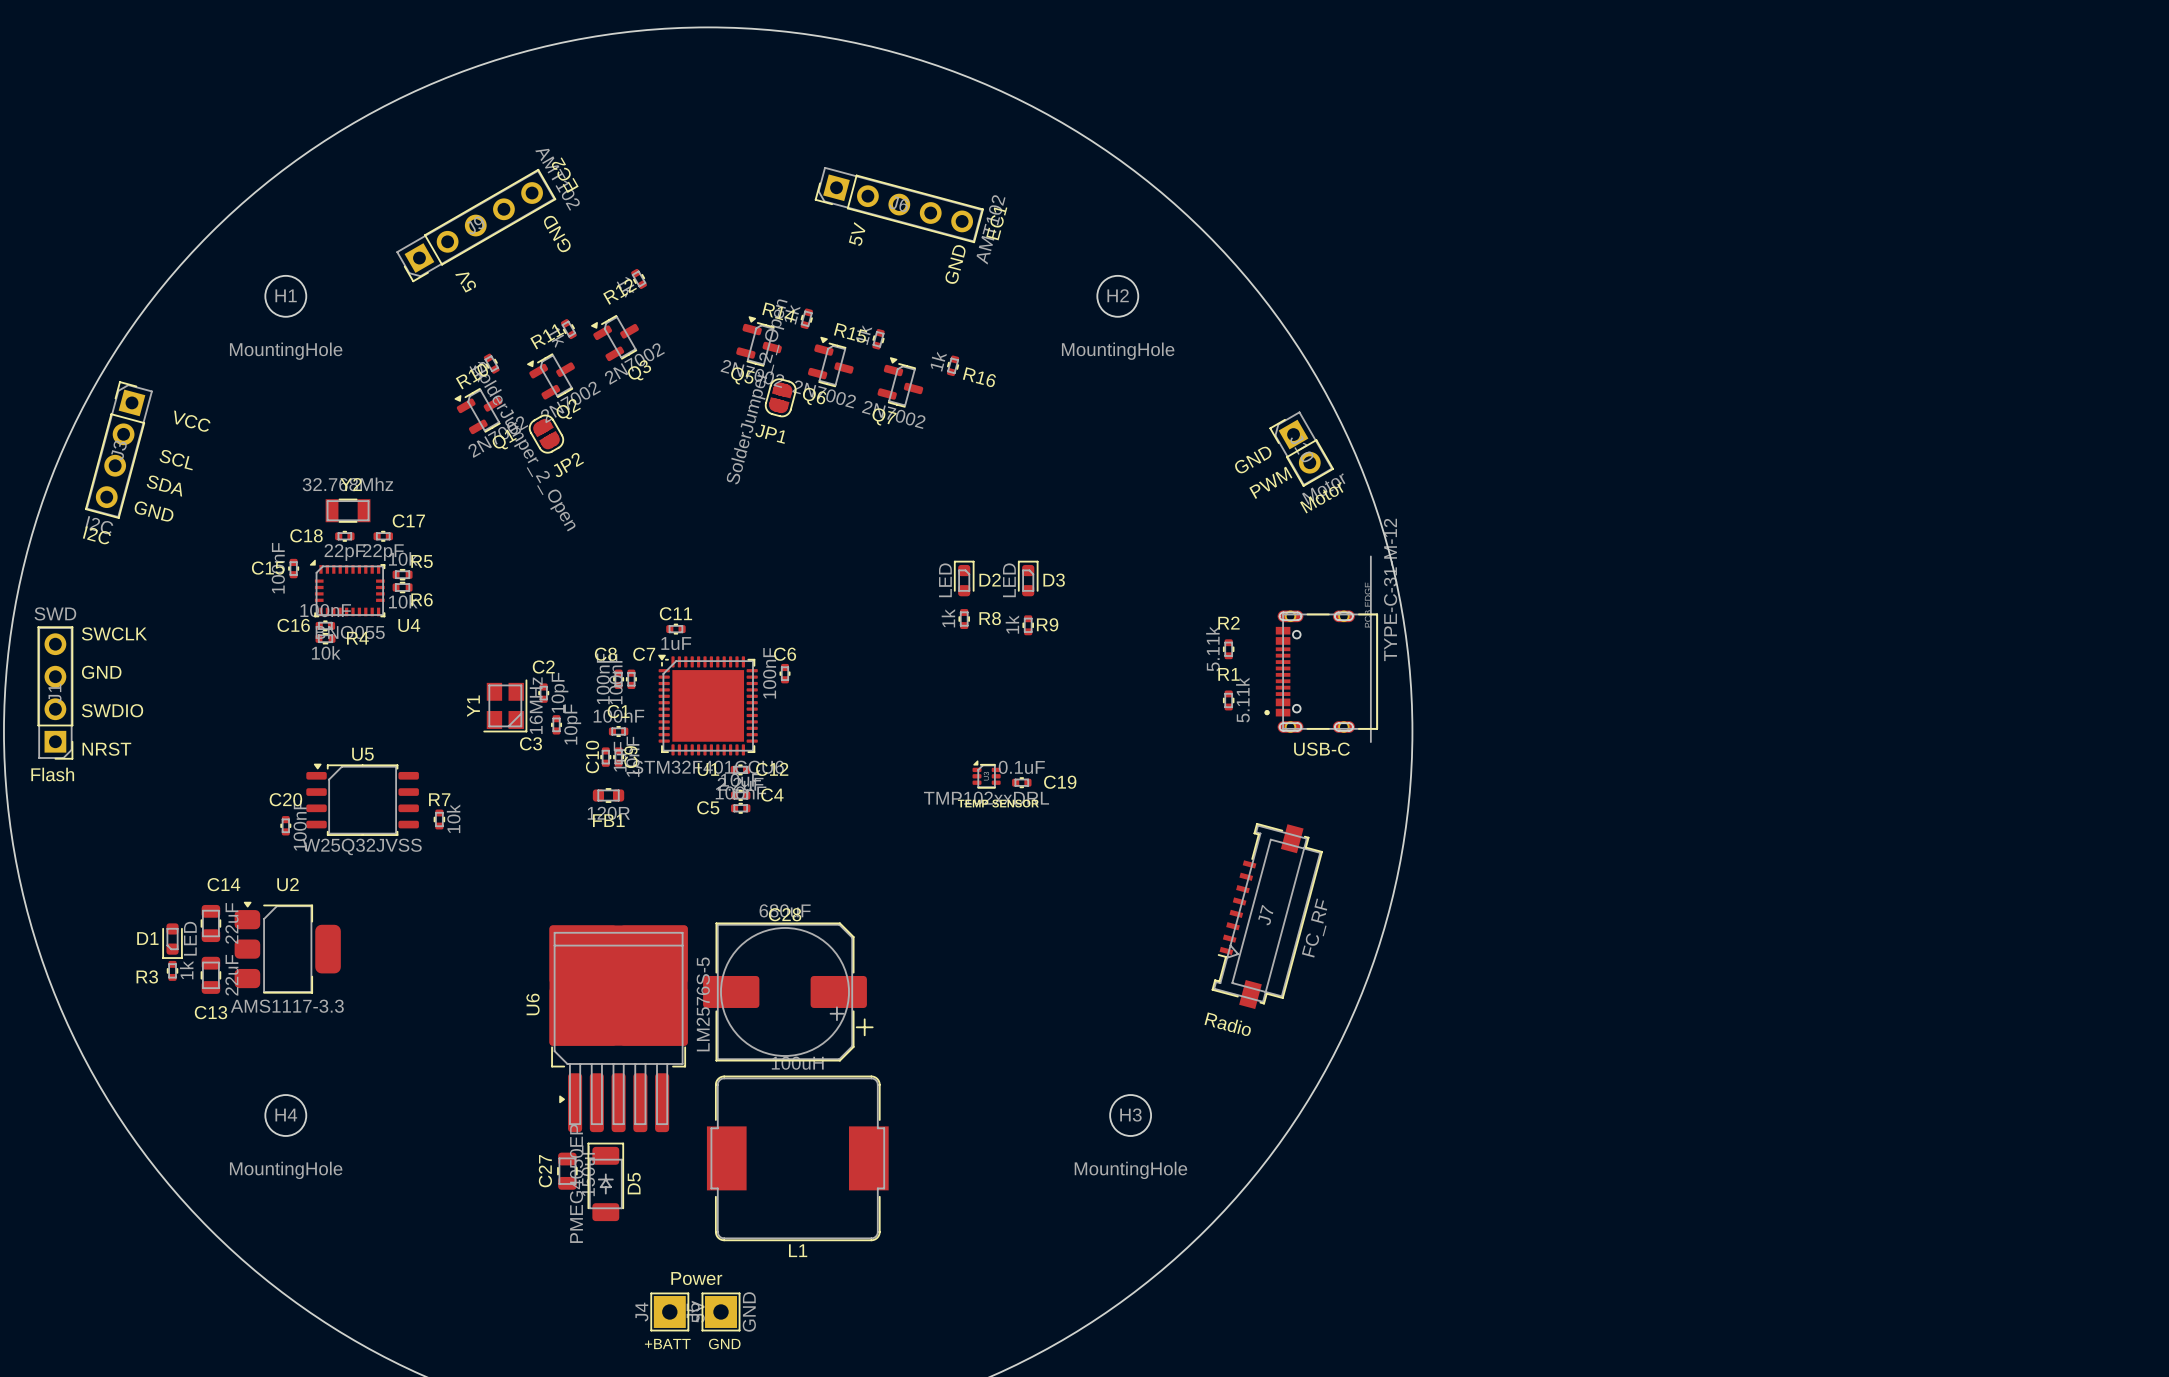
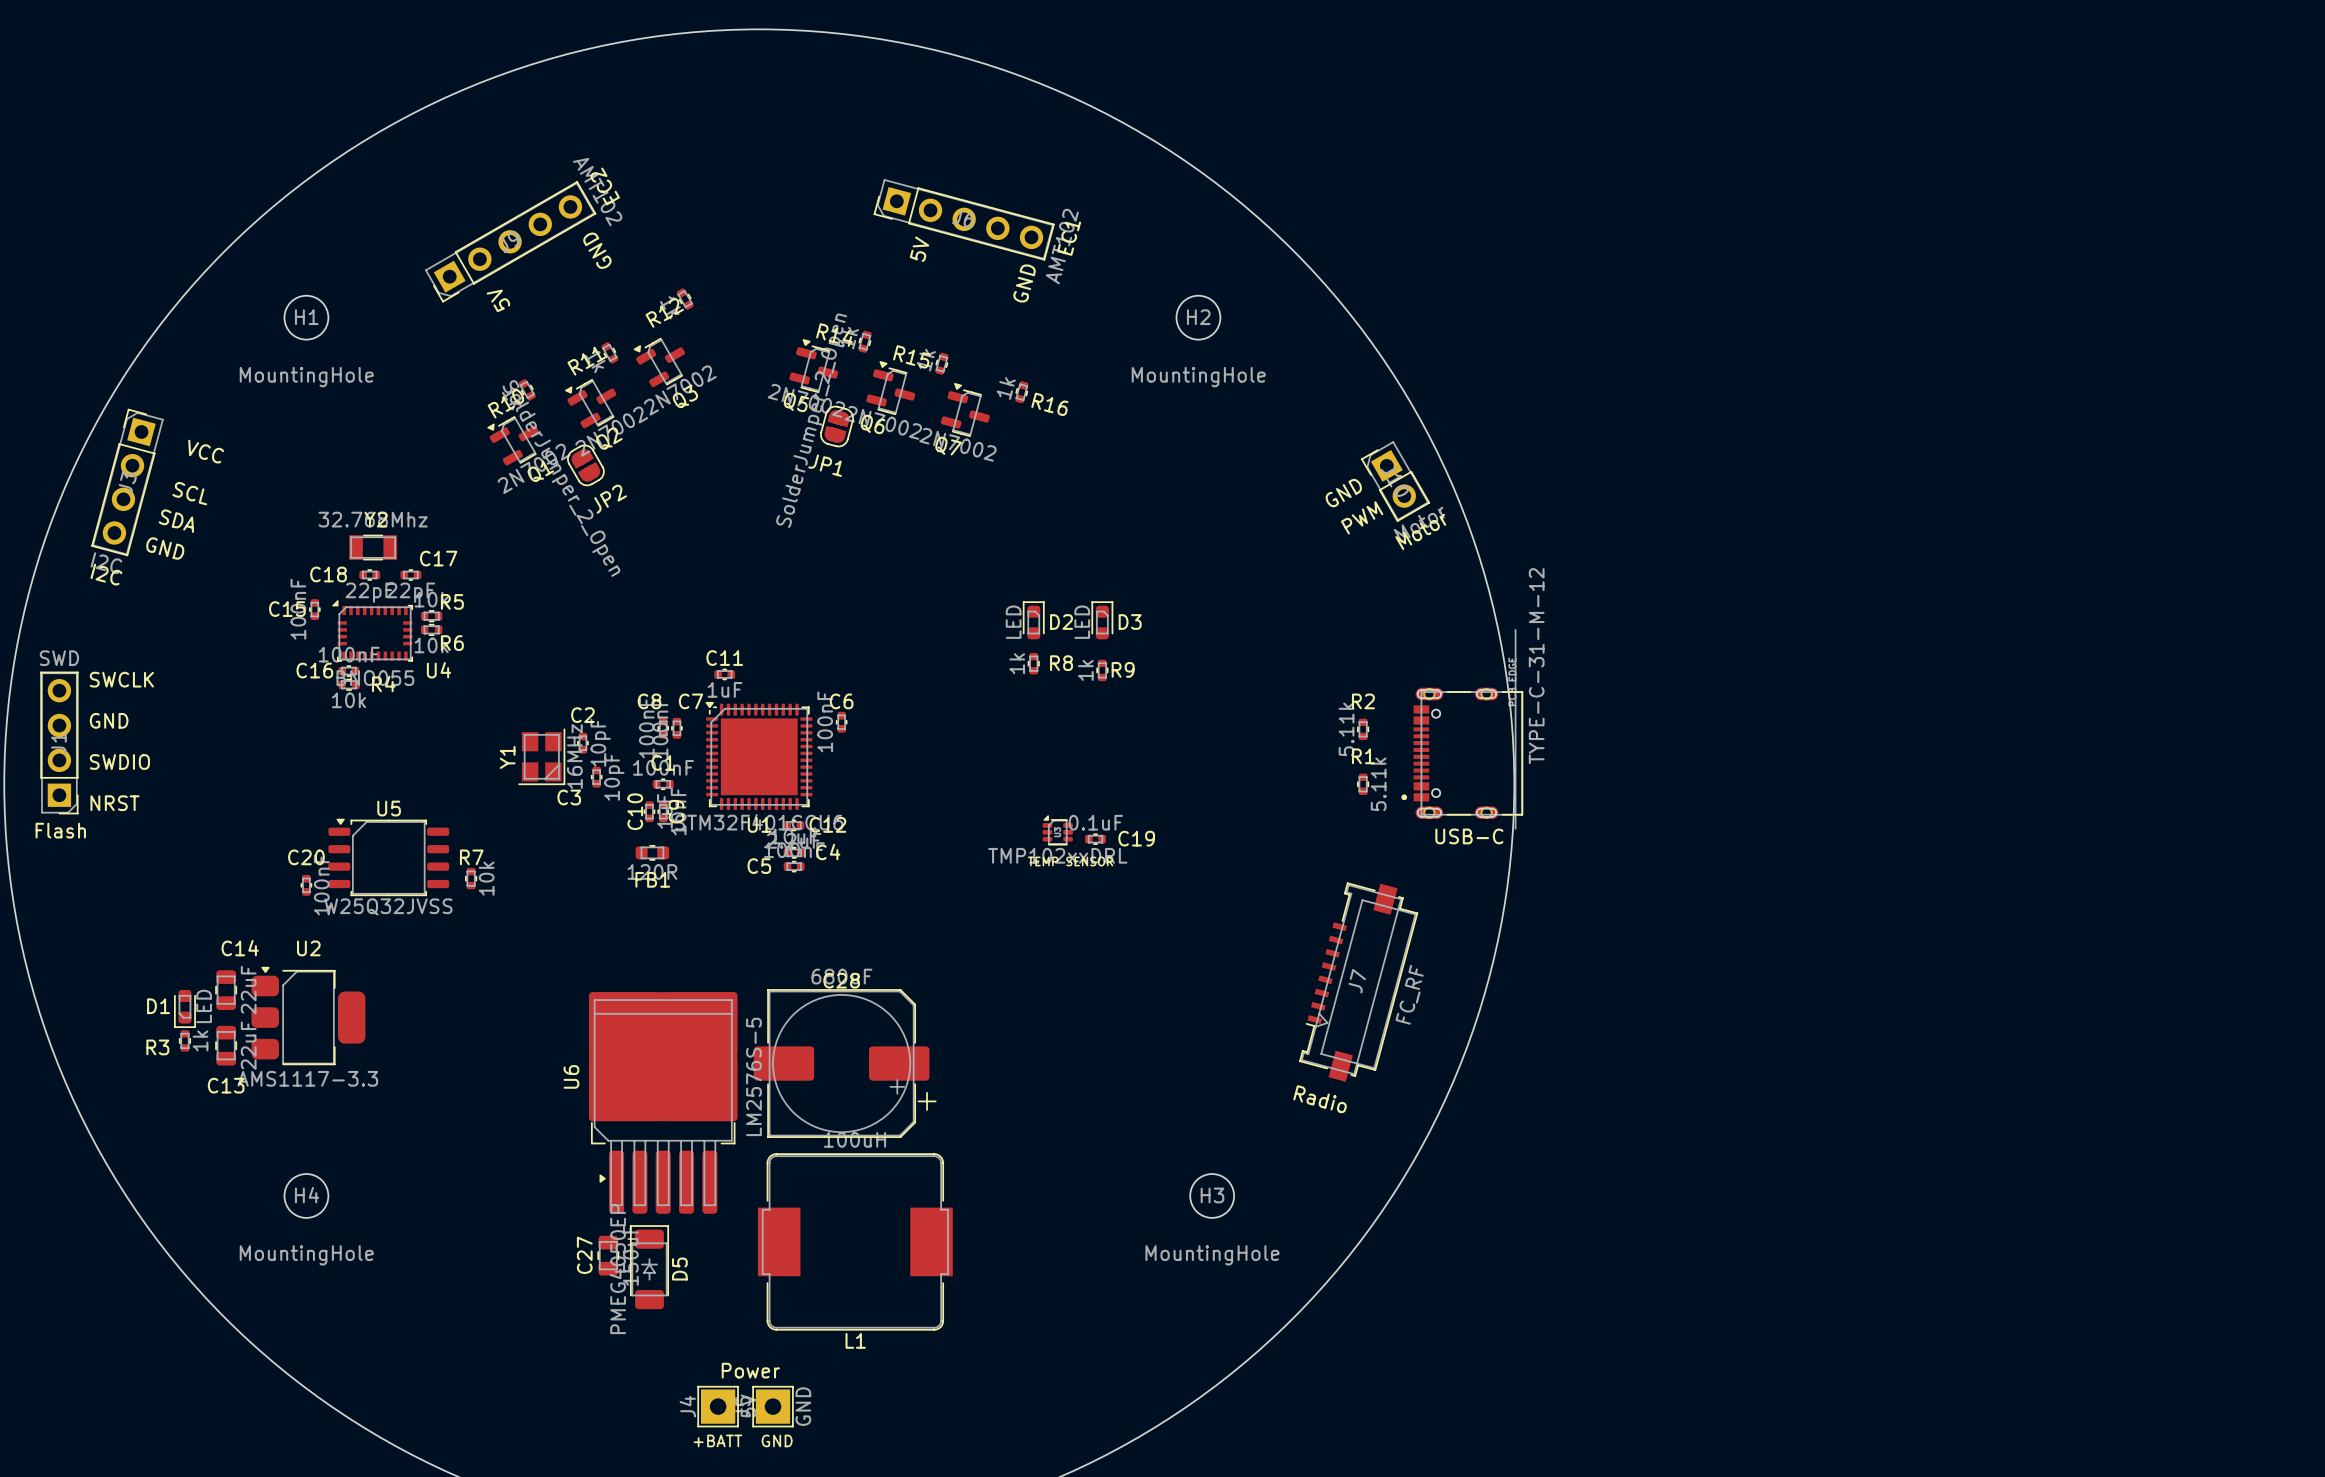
R2 position: (1228, 649) -> (1363, 729)
part position: (1321, 649) -> (1462, 729)
R1 position: (1228, 700) -> (1363, 784)
text position: USB-C (1321, 749) -> USB-C (1469, 836)

